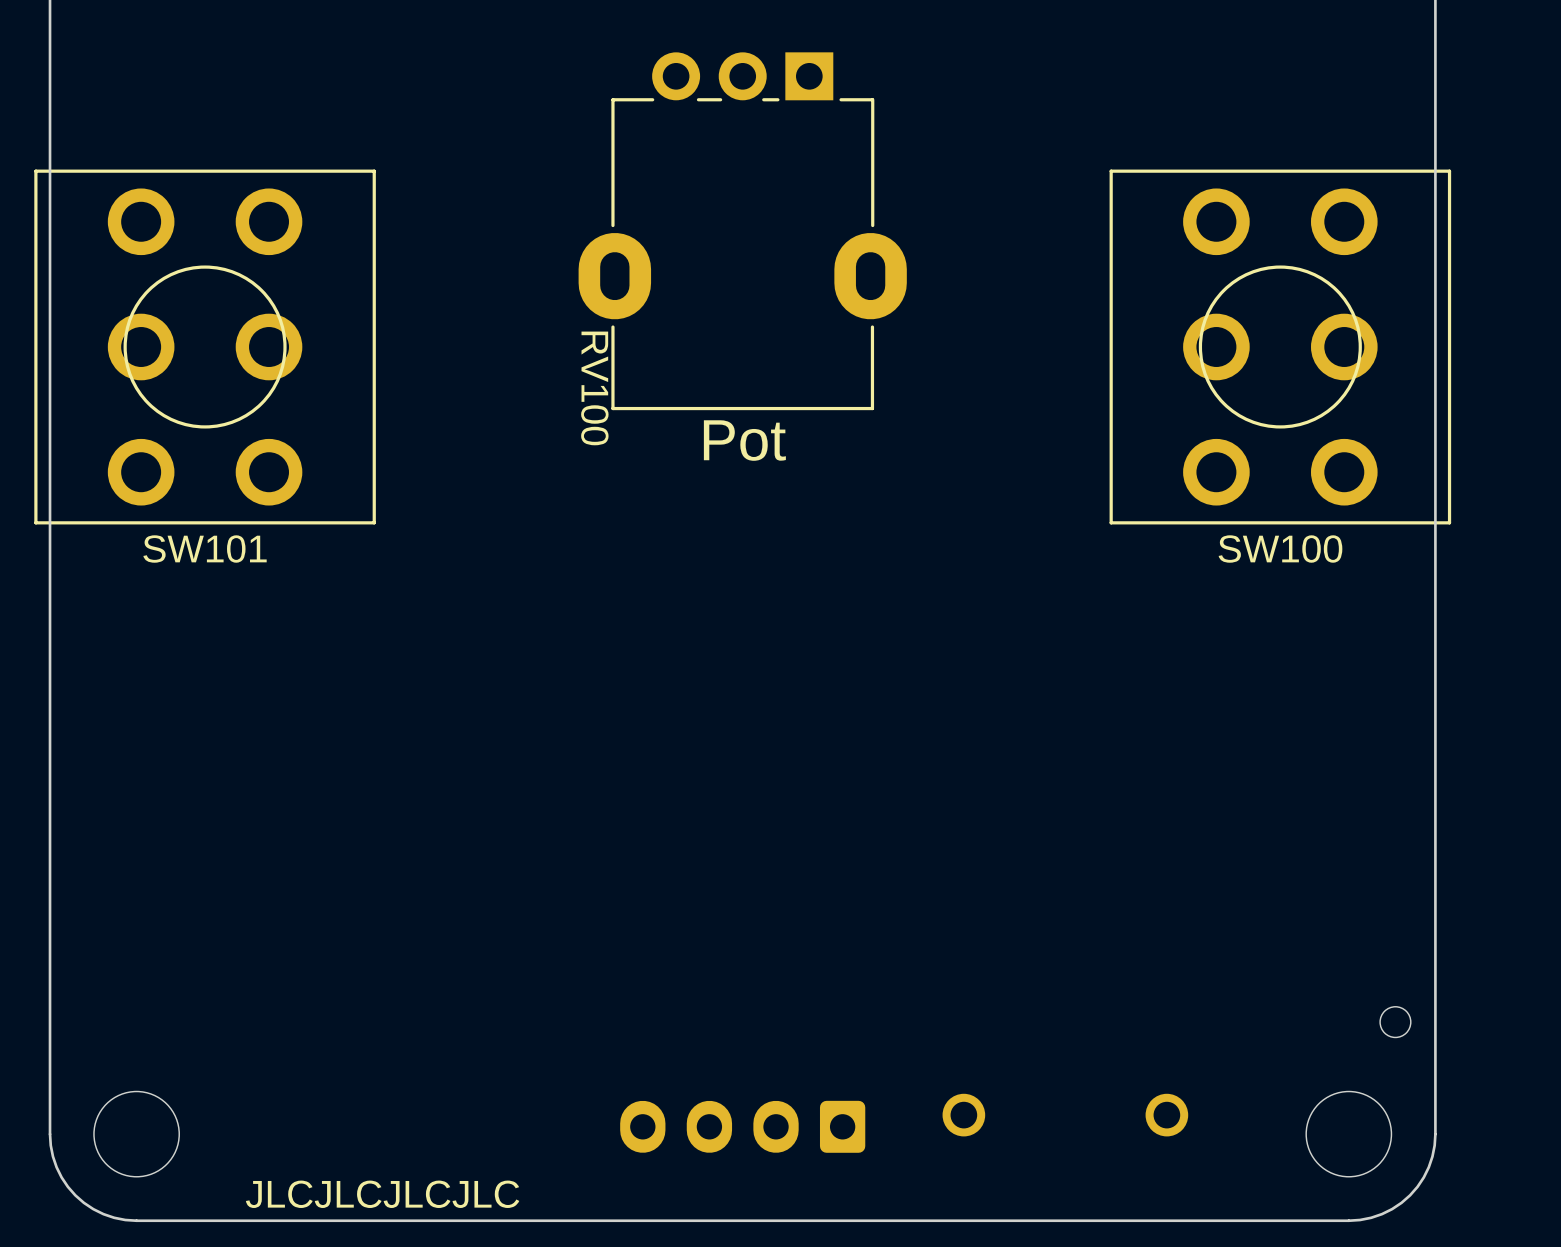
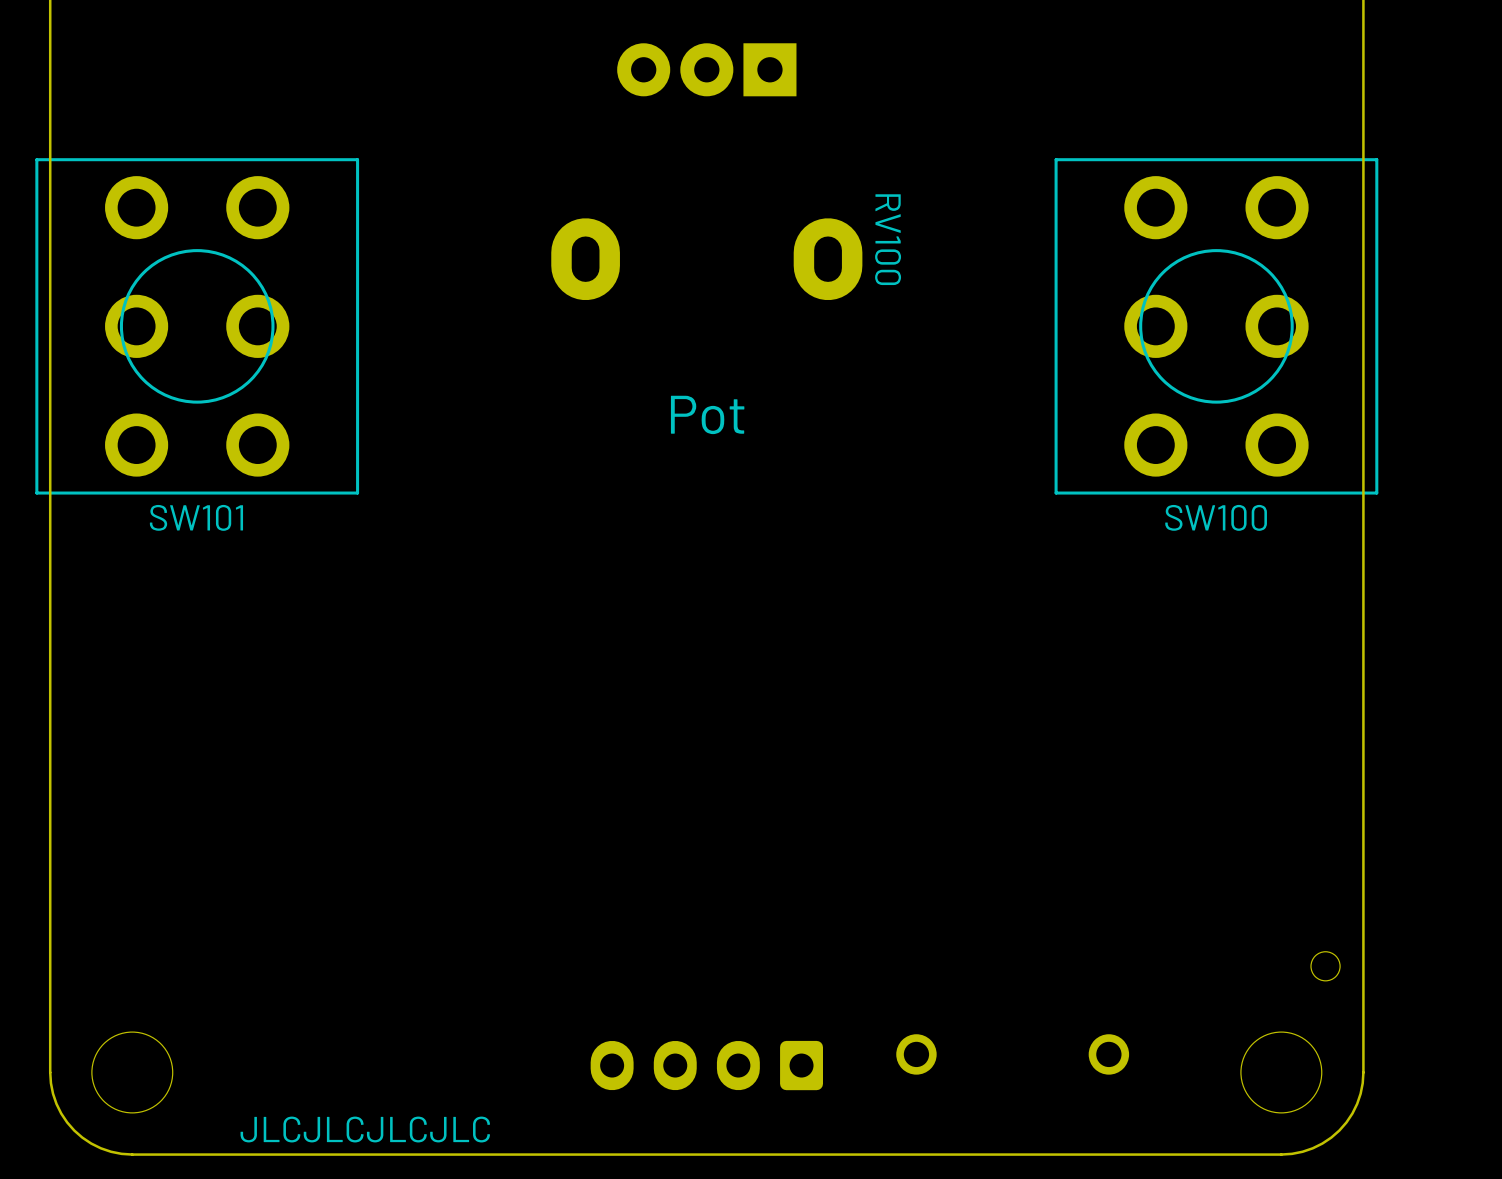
RV100 footprint: [578, 52, 907, 411] -> [551, 43, 863, 301]
RV100 name position: RV100 (594, 388) -> RV100 (888, 239)

